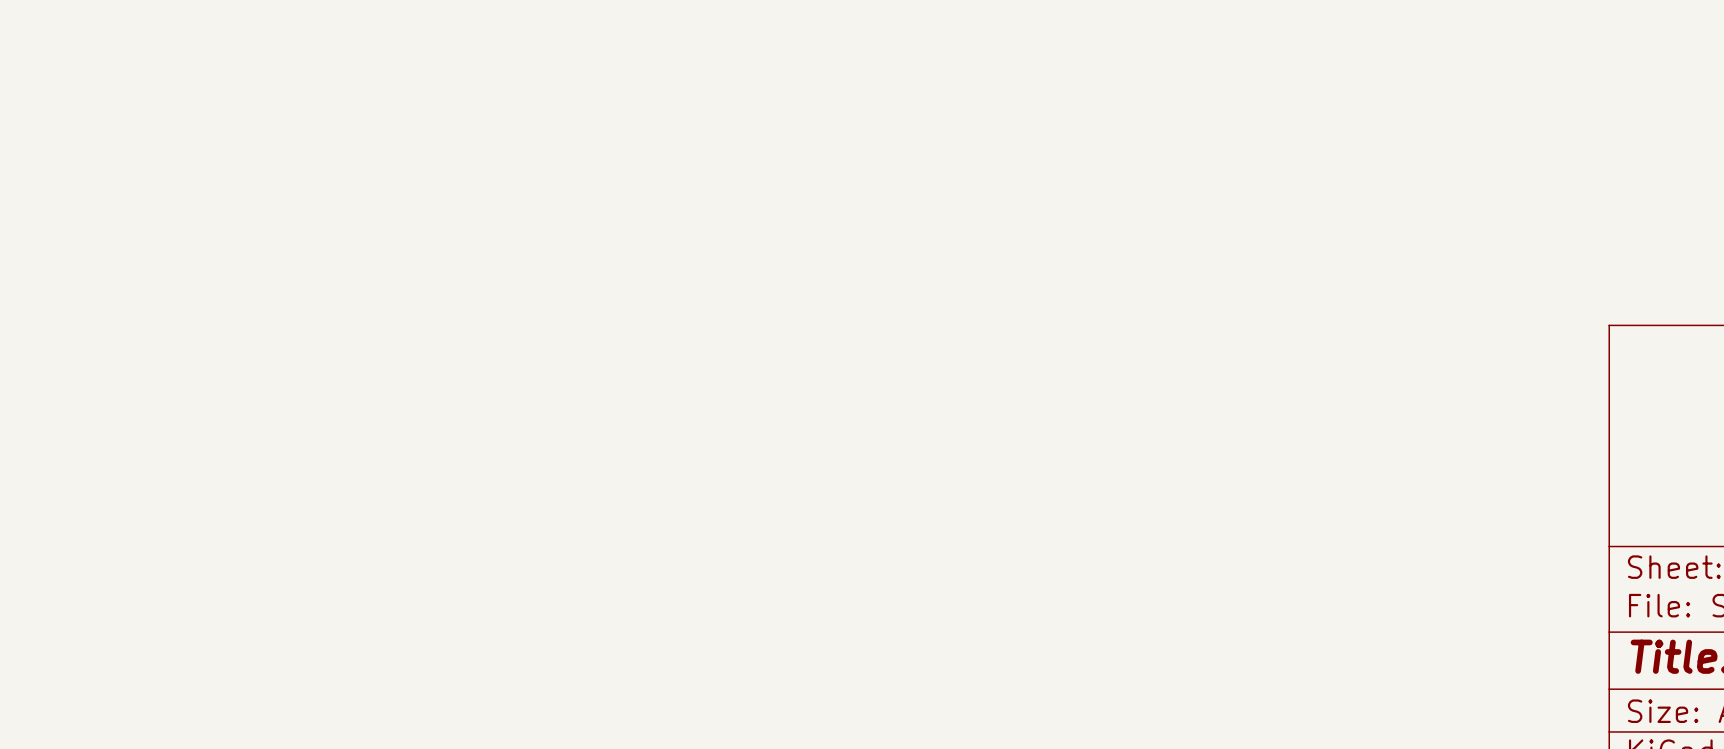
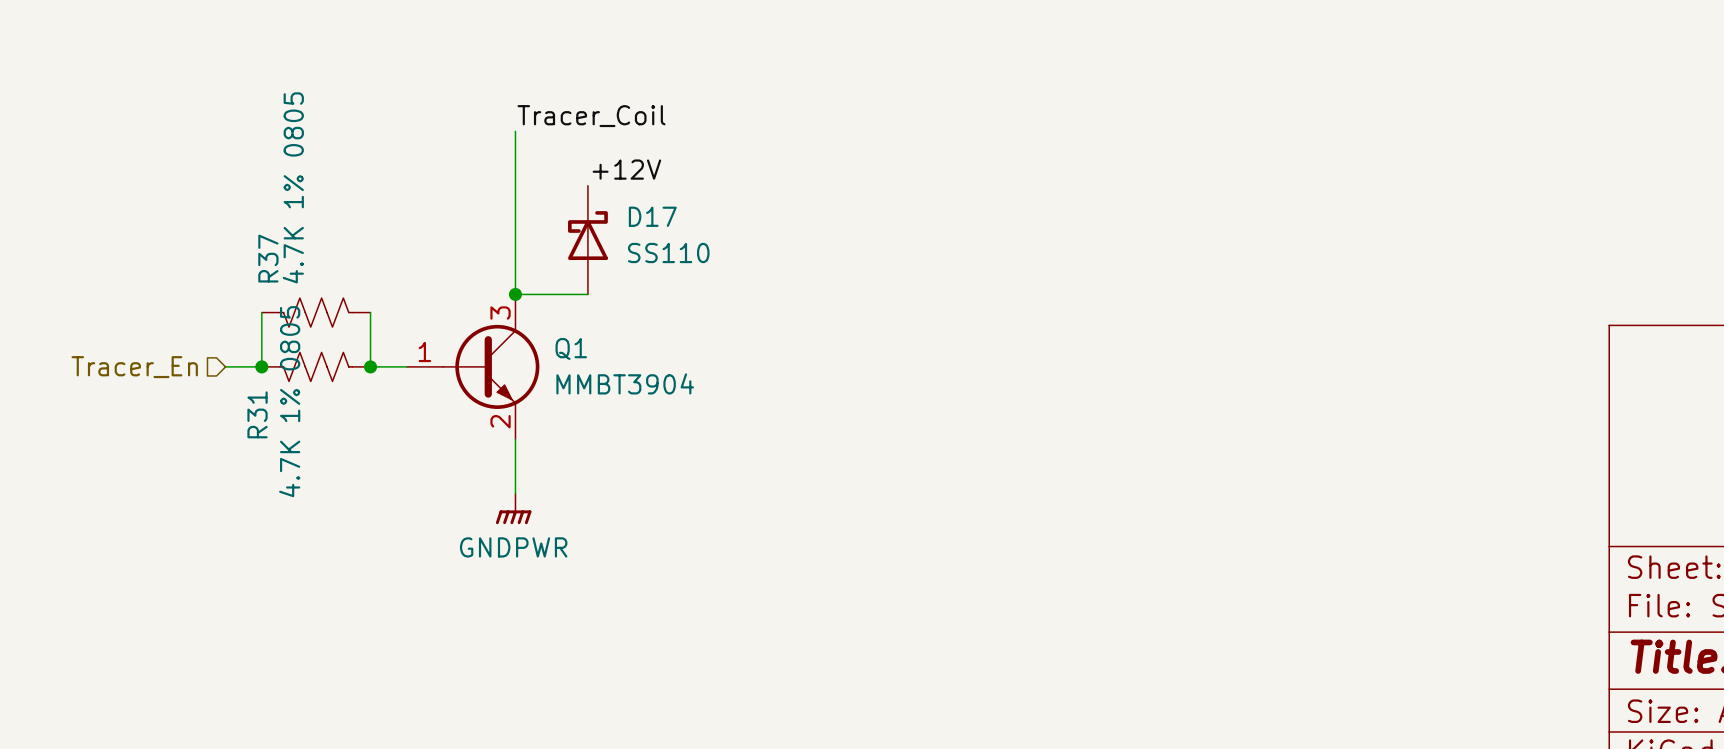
label: none -> Tracer_Coil (591, 116)
wire: none -> (515, 131) (515, 294) (587, 294)
label: none -> +12V (626, 169)
D17: none -> SS110 (587, 240)
junction: none -> (515, 294)
wire: none -> (261, 312) (261, 366) (225, 366)
R37: none -> 4.7K 1% 0805 (316, 312)
wire: none -> (370, 312) (370, 366) (406, 366)
junction: none -> (261, 366)
R31: none -> 4.7K 1% 0805 (316, 366)
junction: none -> (370, 366)
Q1: none -> MMBT3904 (473, 366)
hierarchical label: none -> Tracer_En (134, 367)
wire: none -> (515, 439) (515, 493)
power symbol: none -> GNDPWR (513, 508)

